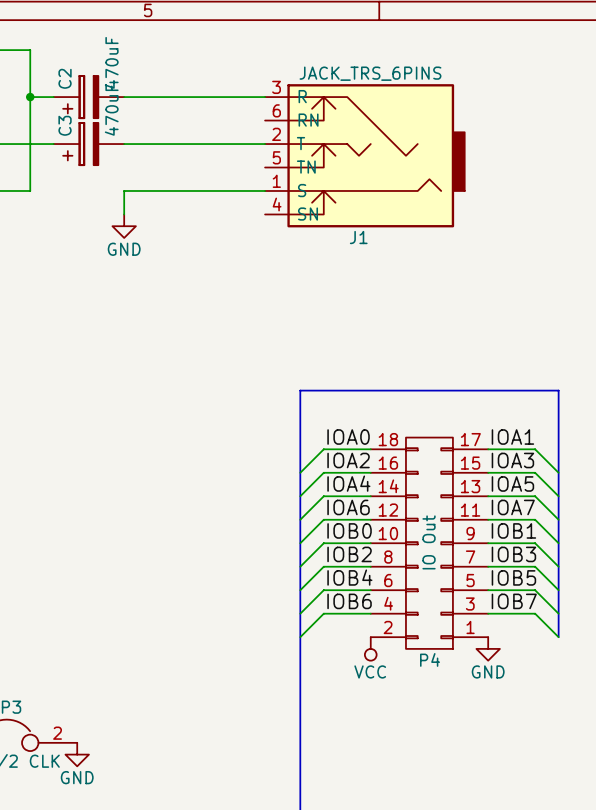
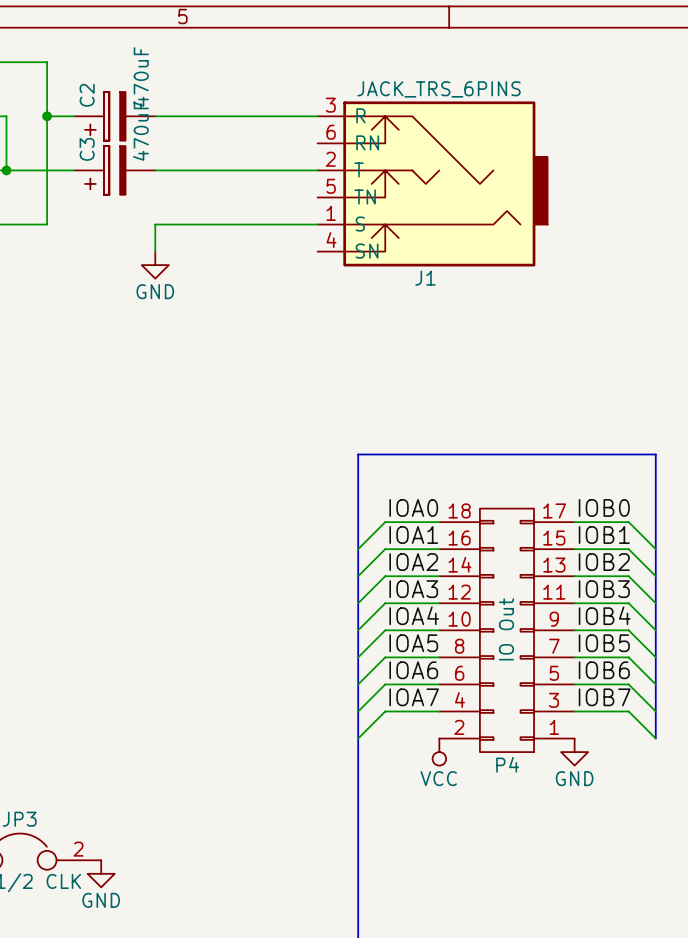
label: IOA1 (512, 437) -> IOB0 (604, 507)
label: IOA2 (348, 460) -> IOA1 (413, 535)
label: IOA3 (512, 460) -> IOB1 (604, 535)
label: IOA4 (348, 483) -> IOA2 (413, 562)
label: IOA5 (512, 483) -> IOB2 (604, 562)
label: IOA6 (348, 507) -> IOA3 (413, 589)
label: IOA7 (513, 507) -> IOB3 (604, 589)
label: IOB0 (349, 530) -> IOA4 (414, 615)
label: IOB1 (513, 530) -> IOB4 (604, 615)
label: IOB2 (349, 554) -> IOA5 (413, 643)
label: IOB3 (513, 554) -> IOB5 (604, 643)
label: IOB4 (349, 577) -> IOA6 (413, 670)
label: IOB5 (513, 577) -> IOB6 (604, 670)
label: IOB6 (349, 601) -> IOA7 (414, 697)

